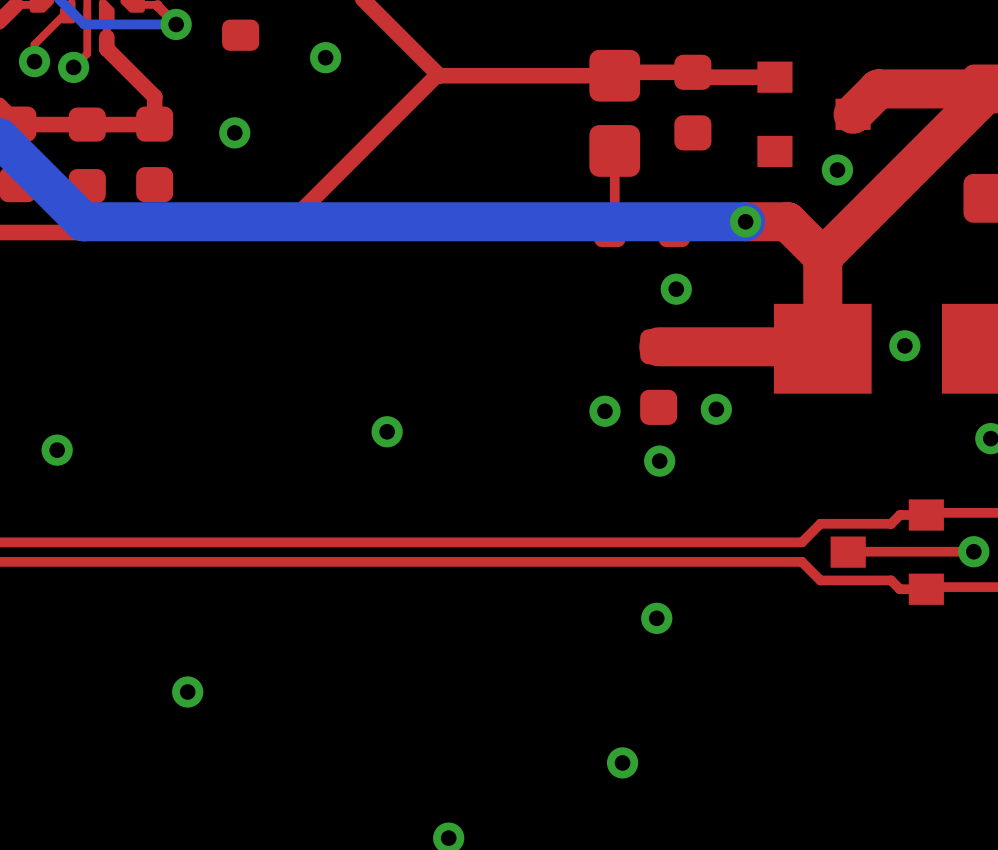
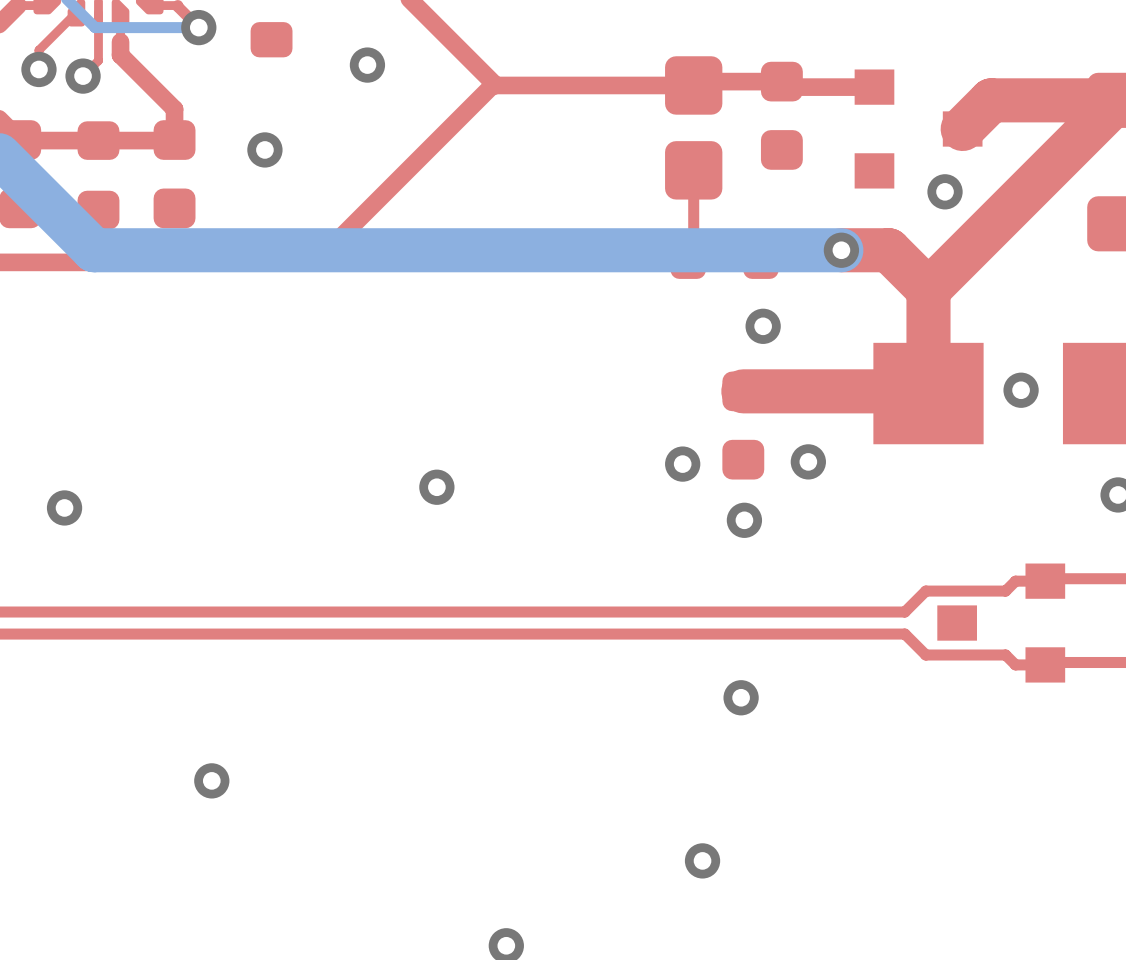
top track: (973, 551) (848, 551) -> none
via: (973, 551) -> none

